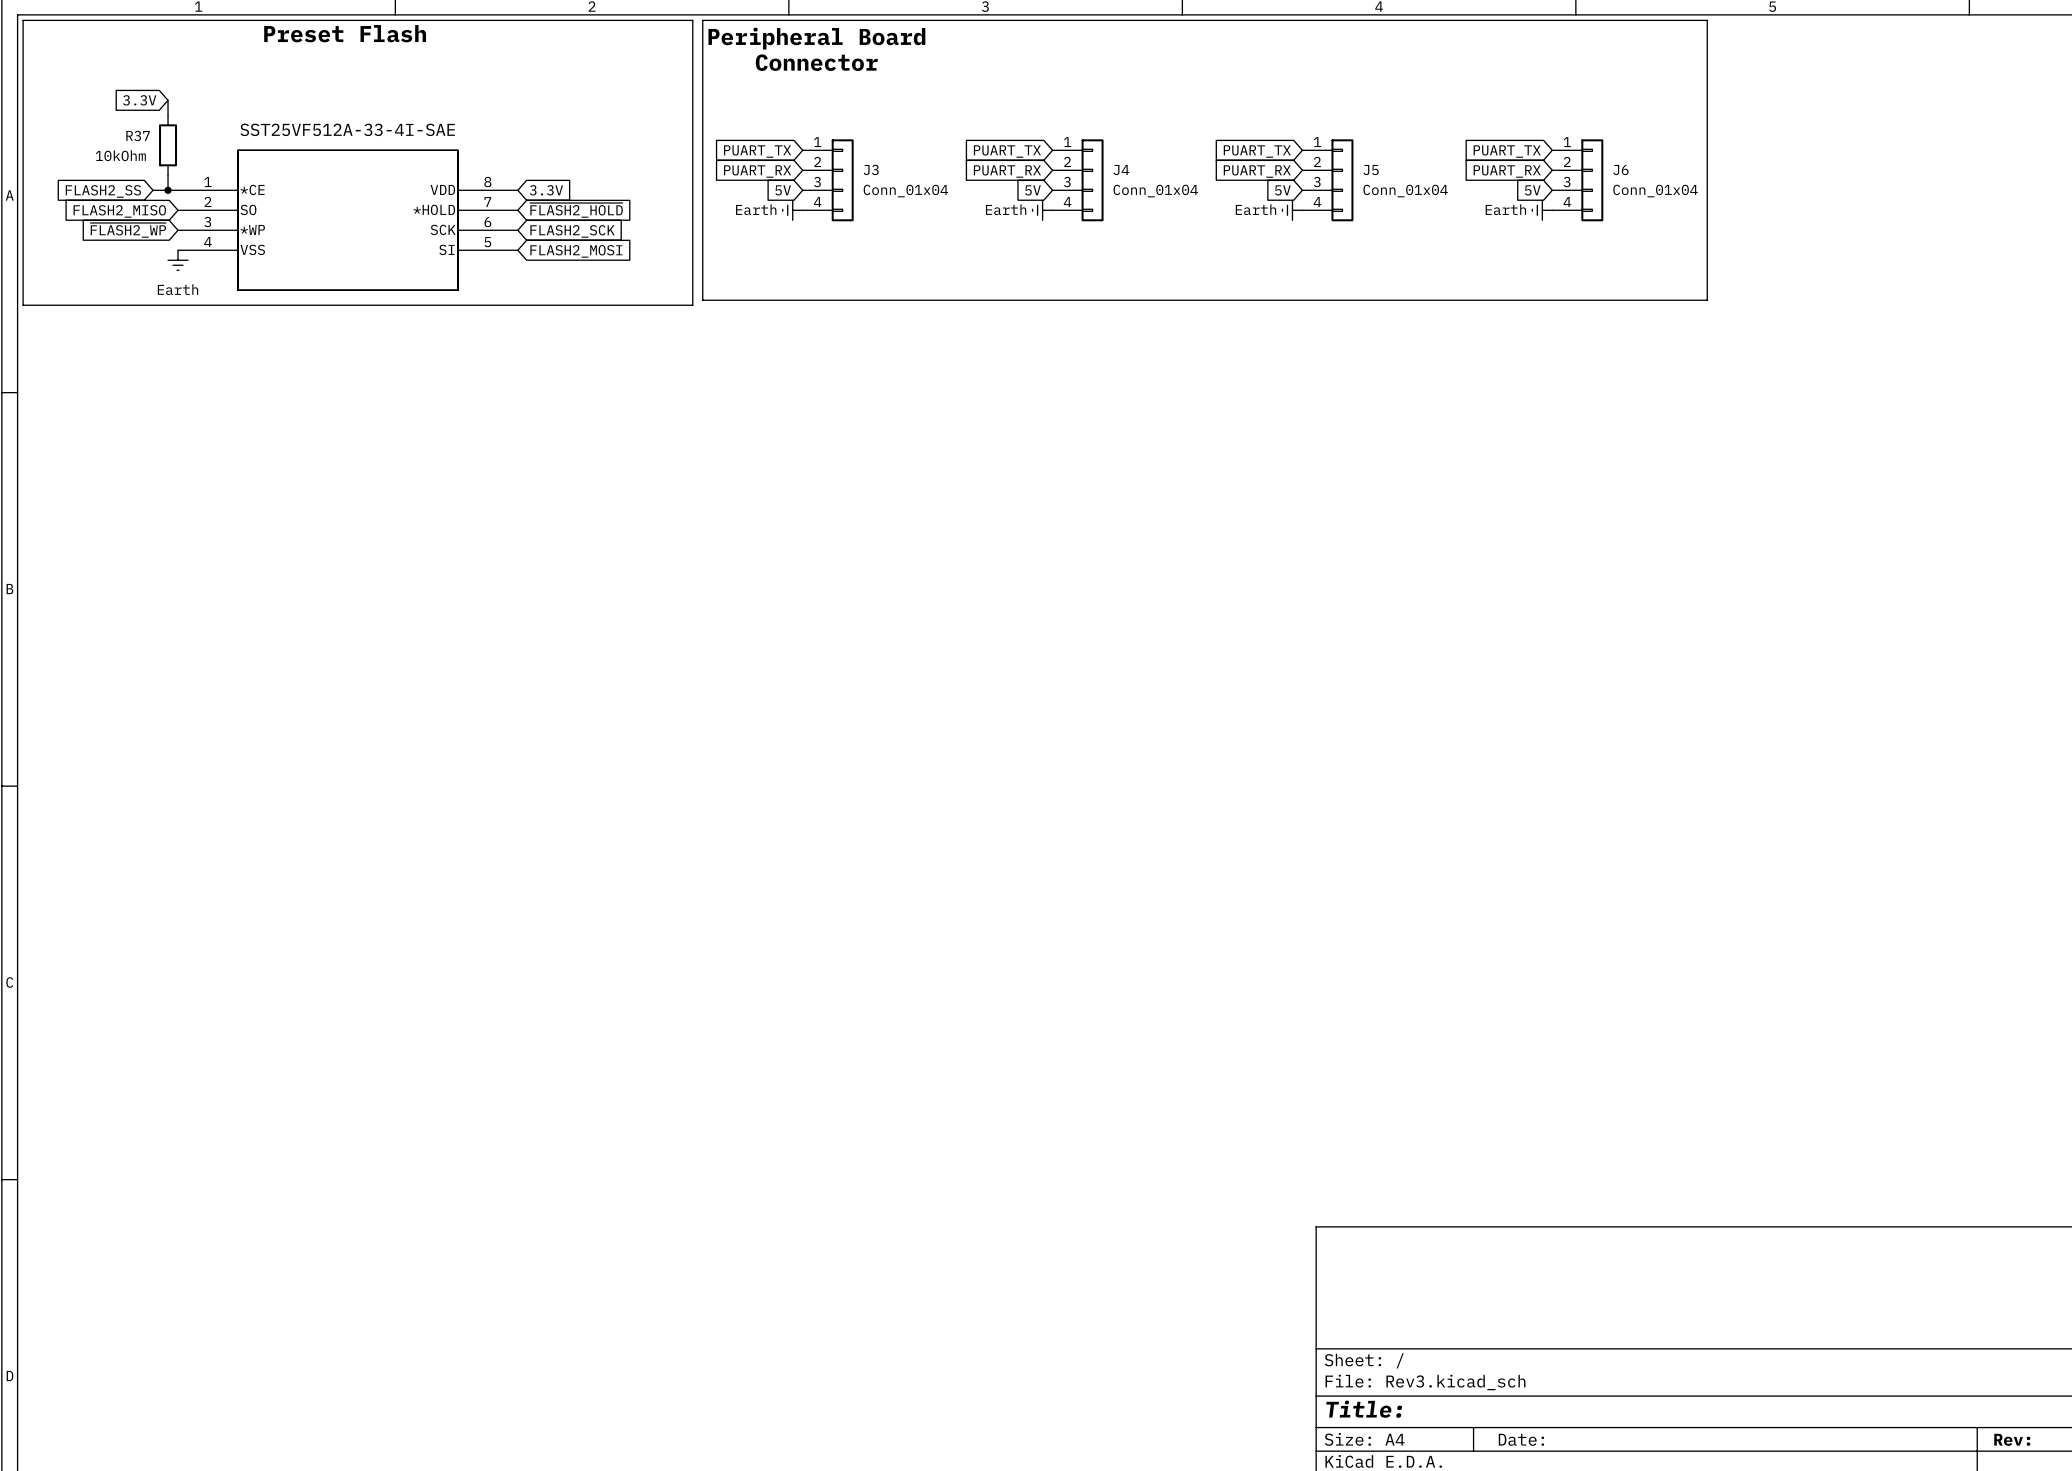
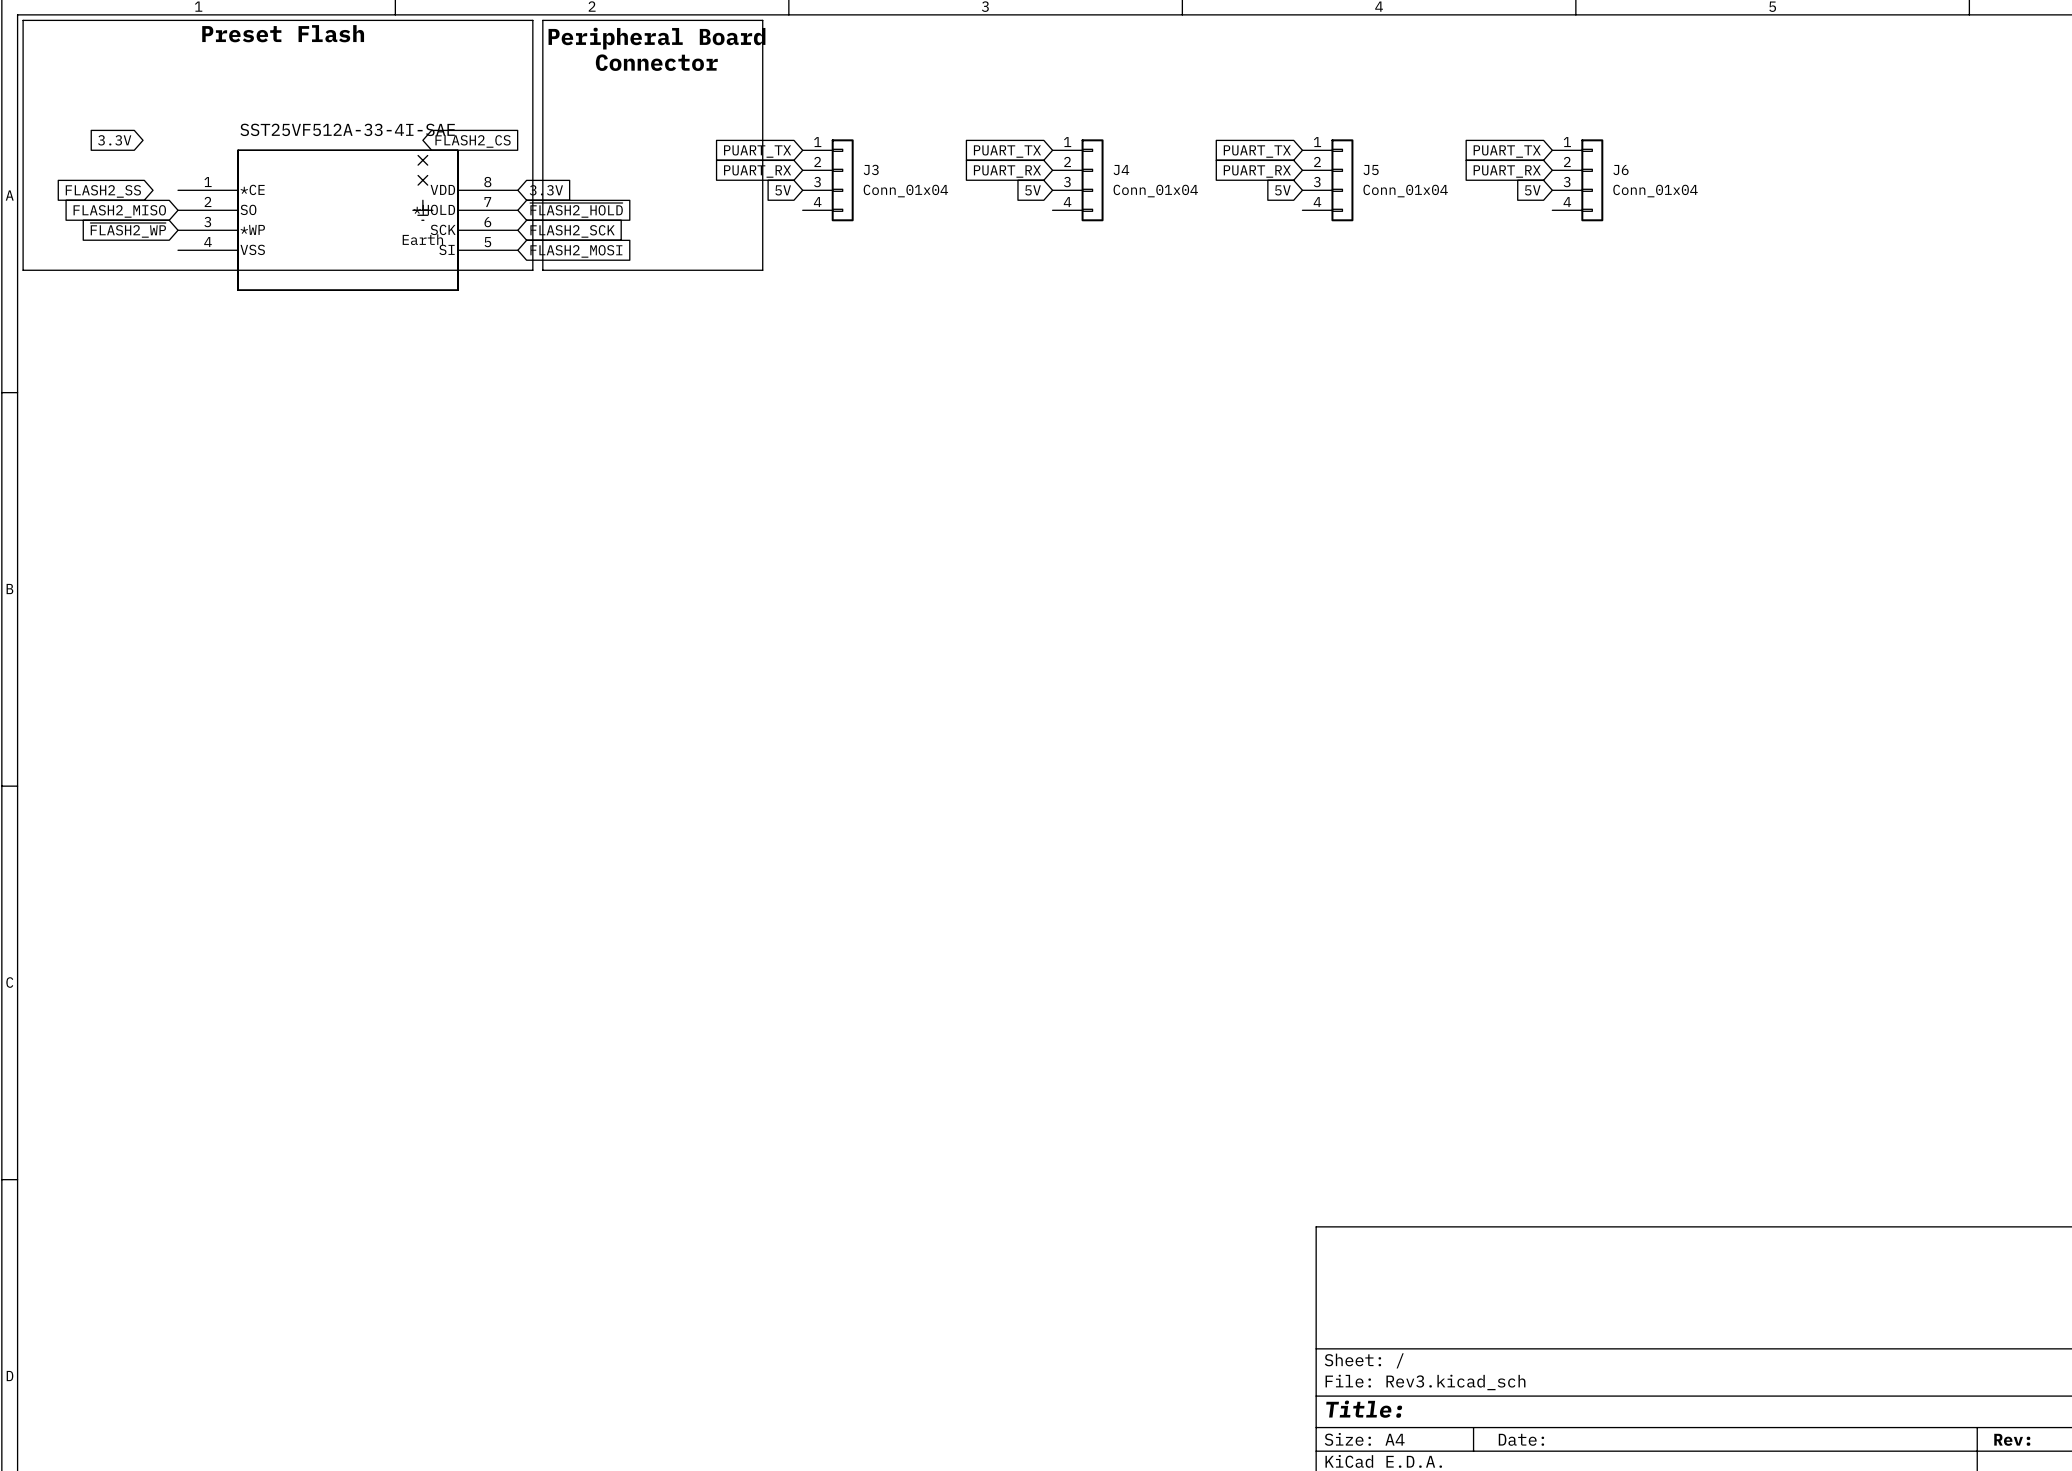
line: (532, 20) (542, 20) -> (762, 20) (762, 270) (542, 270) (542, 20)
line: (692, 20) (692, 305) (23, 305) (23, 270) -> (532, 20) (532, 270) (23, 270)
line: (702, 20) (702, 300) (1707, 300) (1707, 20) (762, 20) -> (702, 20) (692, 20)
text position: Preset Flash (345, 33) -> Preset Flash (283, 33)
text position: Peripheral Board (816, 38) -> Peripheral Board (656, 38)
text position: Connector (816, 62) -> Connector (656, 62)
global label position: 3.3V (139, 100) -> 3.3V (114, 140)
wire: (168, 100) (168, 115) -> none
global label: none -> FLASH2_CS (473, 141)
R37: 10kOhm (168, 145) -> none
no-connect mark: none -> (422, 160)
wire: (168, 175) (168, 190) -> none
no-connect mark: none -> (422, 180)
wire: (153, 190) (178, 190) -> none
junction: (168, 190) -> none
power symbol: none -> Earth (422, 210)
power symbol: Earth (792, 210) -> none
power symbol: Earth (1042, 210) -> none
power symbol: Earth (1292, 210) -> none
power symbol: Earth (1542, 210) -> none
power symbol: Earth (178, 260) -> none

